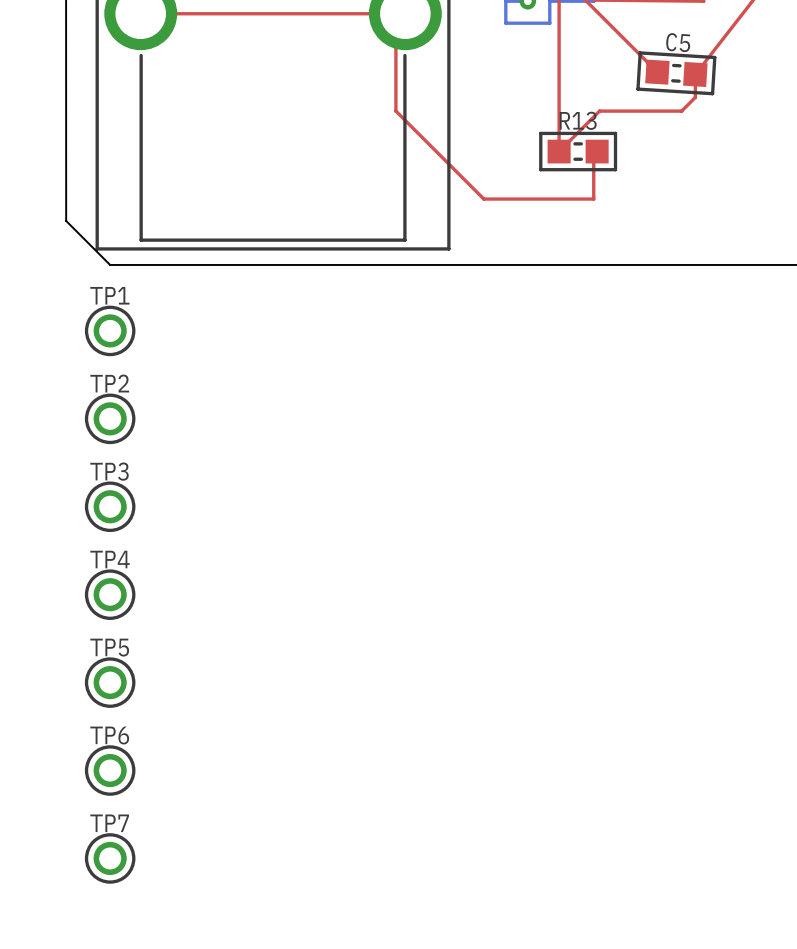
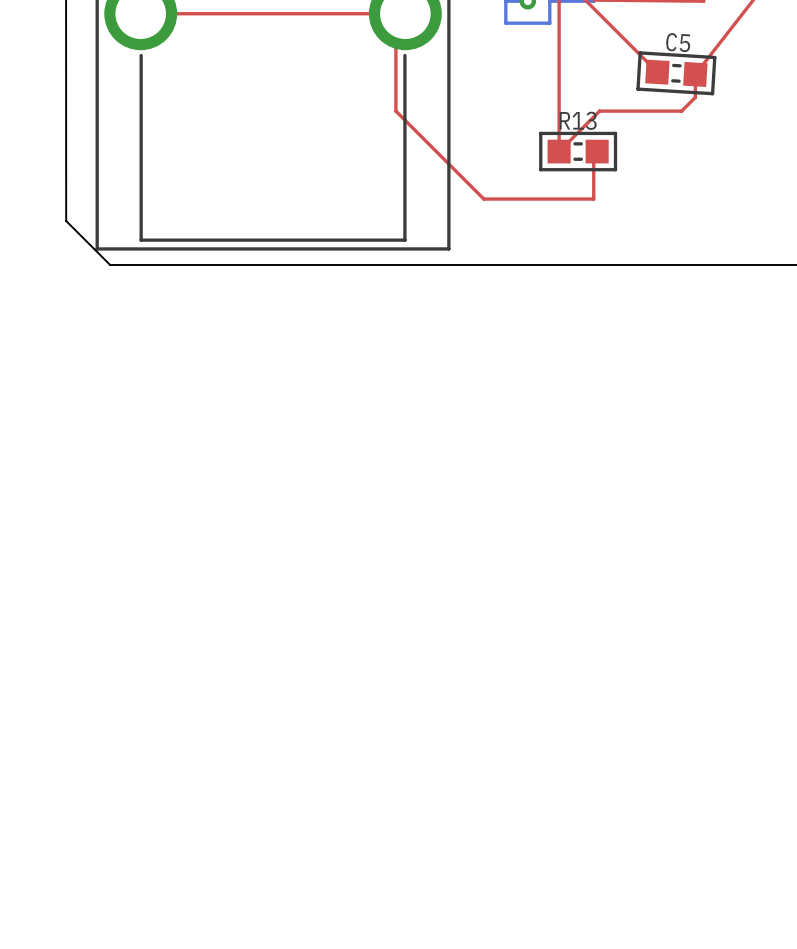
TP1: (110, 330) -> none
TP2: (110, 418) -> none
TP3: (110, 506) -> none
TP4: (110, 594) -> none
TP5: (110, 682) -> none
TP6: (110, 770) -> none
TP7: (110, 858) -> none

